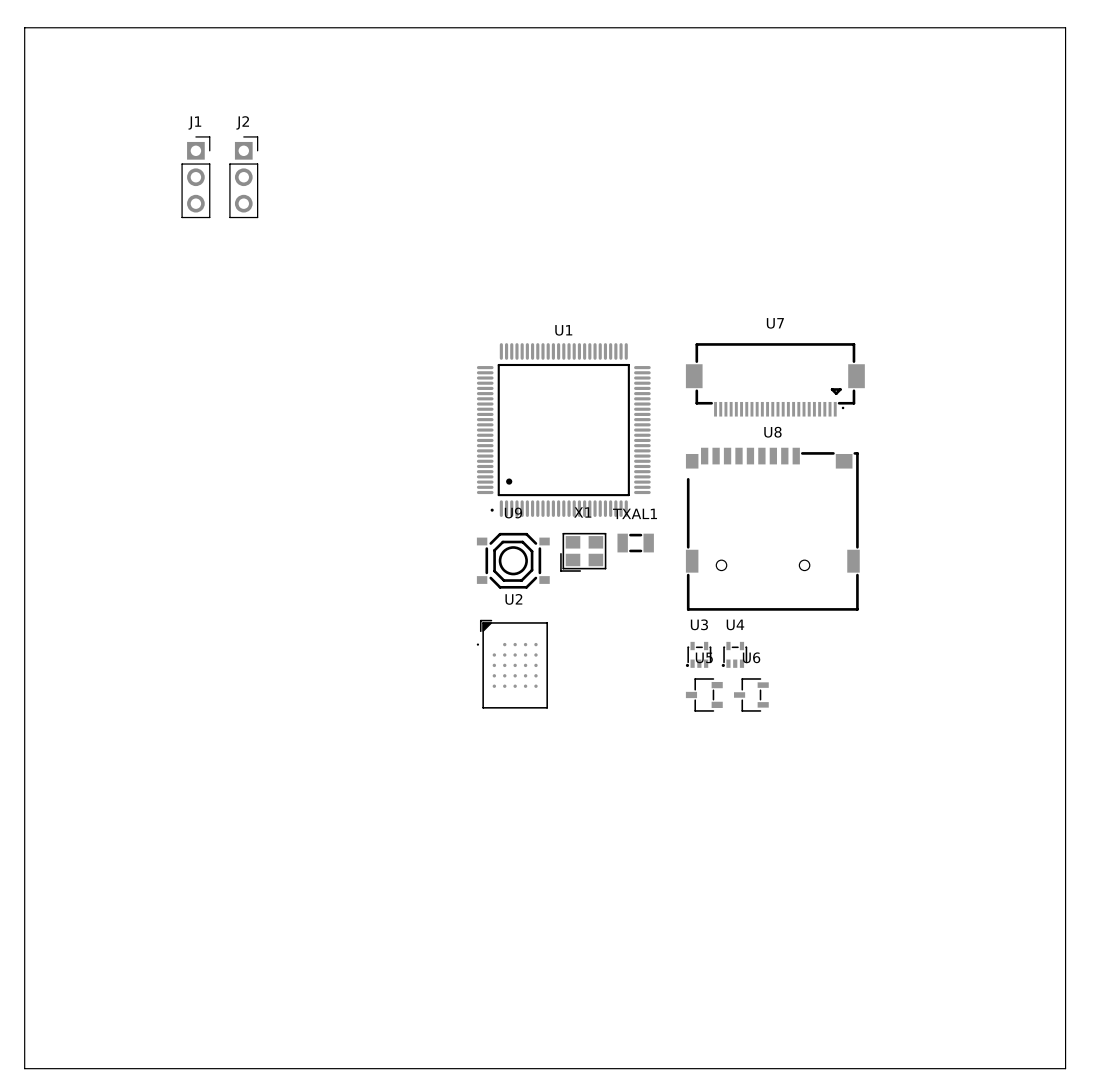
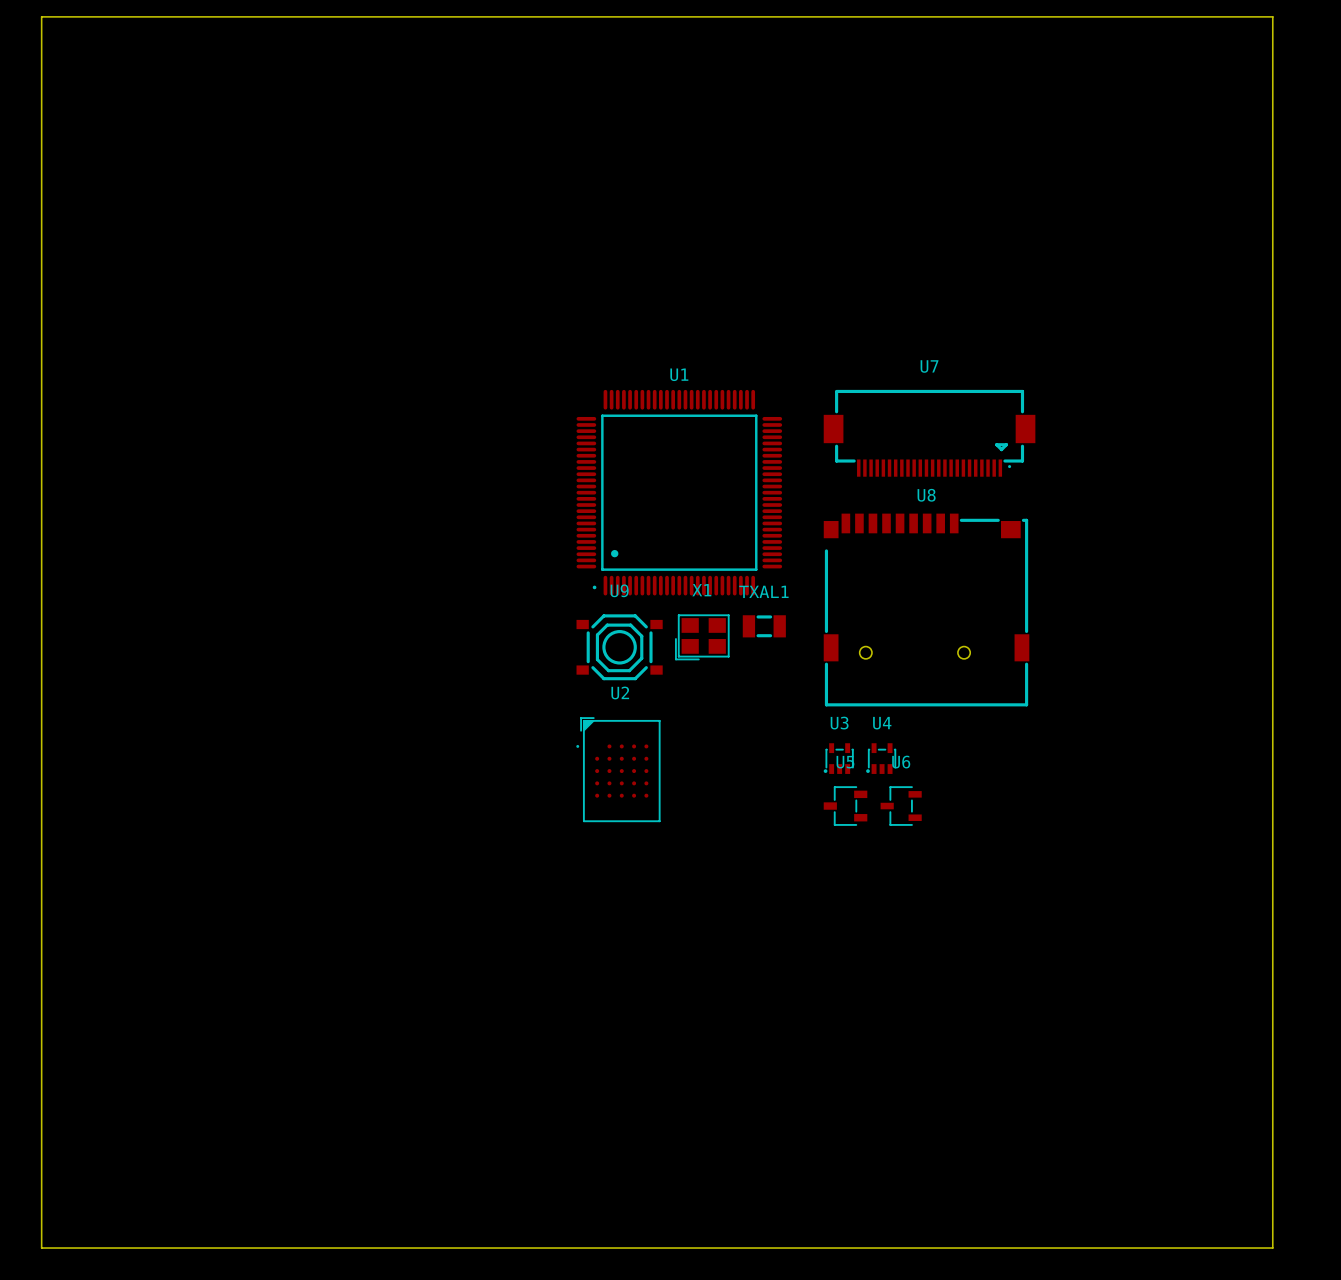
J1: (195, 177) -> none
J2: (243, 177) -> none

